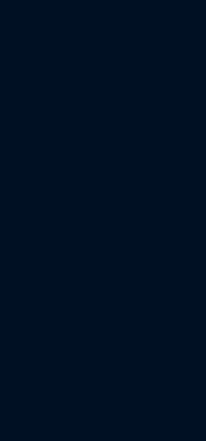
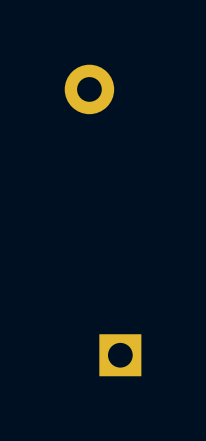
part: none -> (89, 89)
part: none -> (120, 355)

